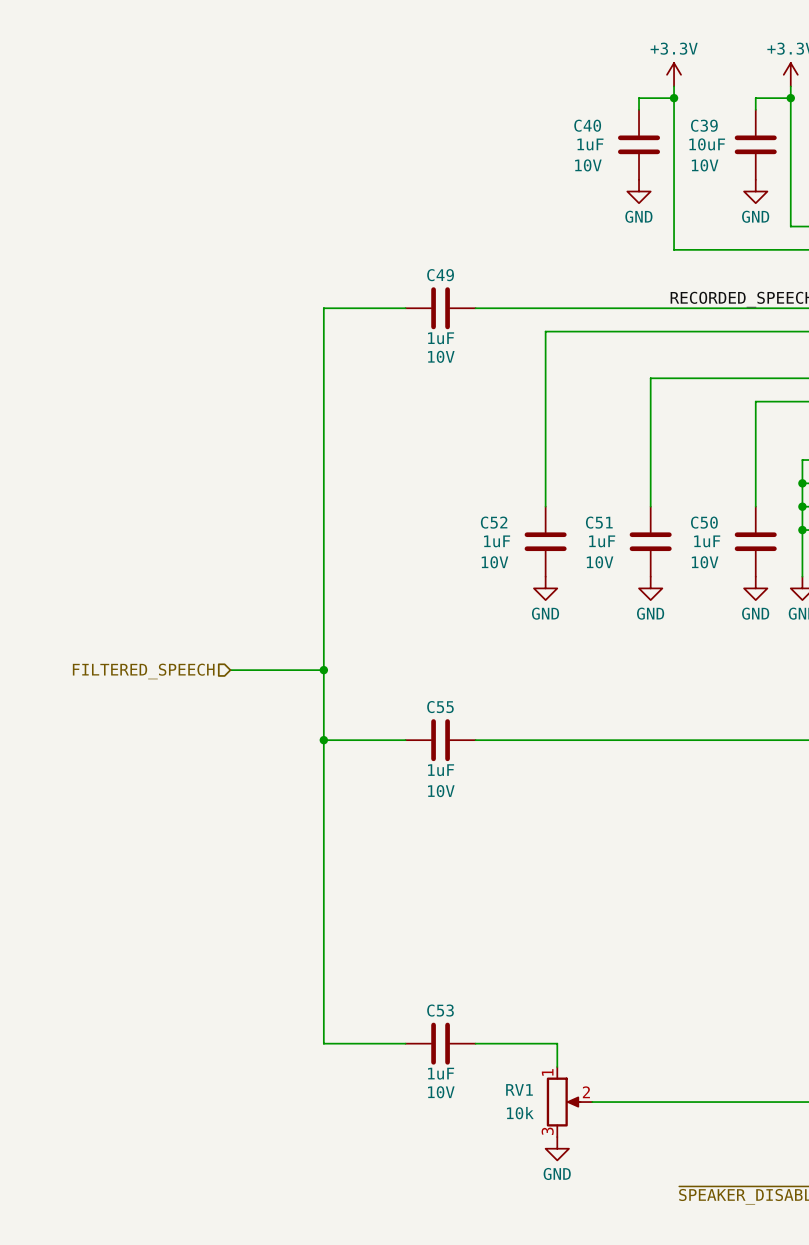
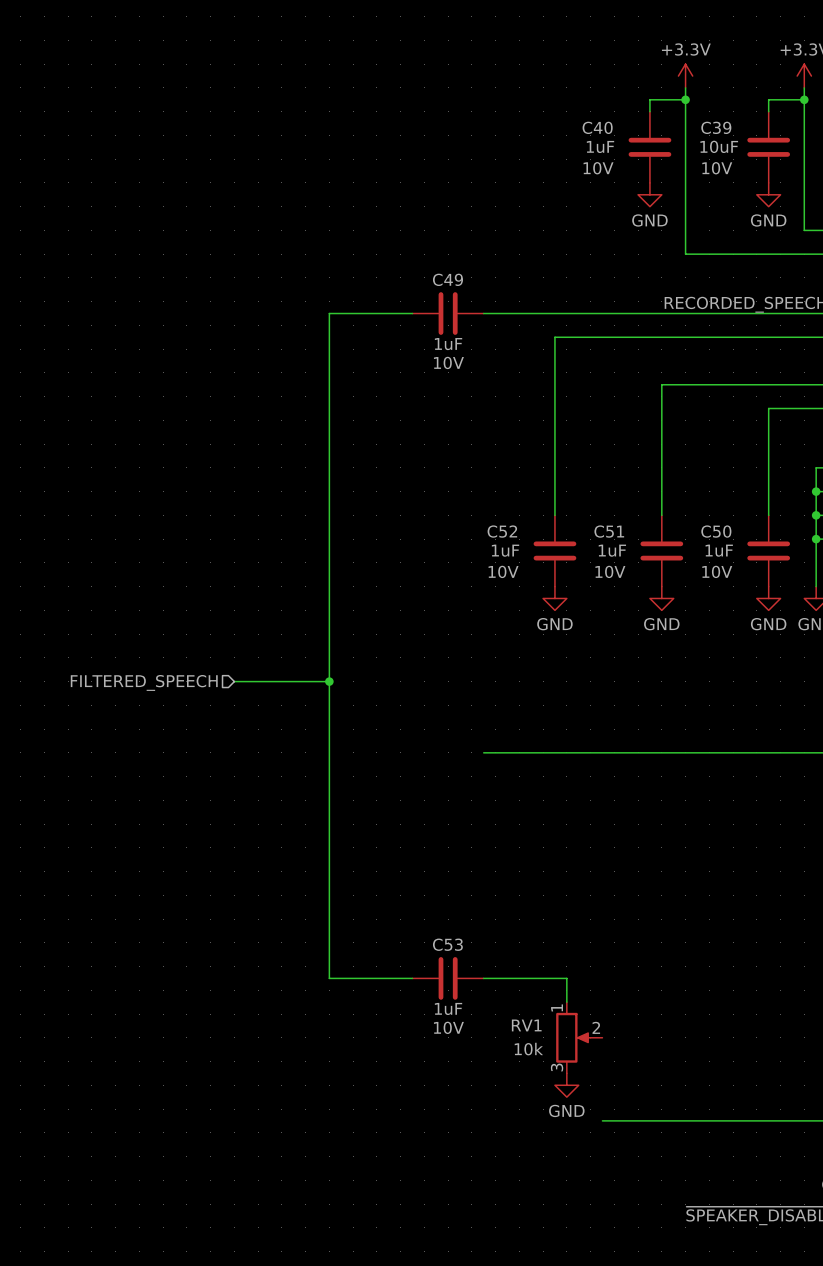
wire: (323, 740) (405, 740) -> none
junction: (323, 740) -> none
C55: 1uF (440, 740) -> none
wire: (323, 961) (323, 1043) (405, 1043) -> (329, 978) (412, 978)
C53 position: (440, 1043) -> (448, 978)
wire: (475, 1043) (557, 1043) (557, 1067) -> (483, 978) (566, 978) (566, 1002)
RV1 position: (569, 1102) -> (579, 1037)
power symbol position: GND (557, 1148) -> GND (566, 1085)

